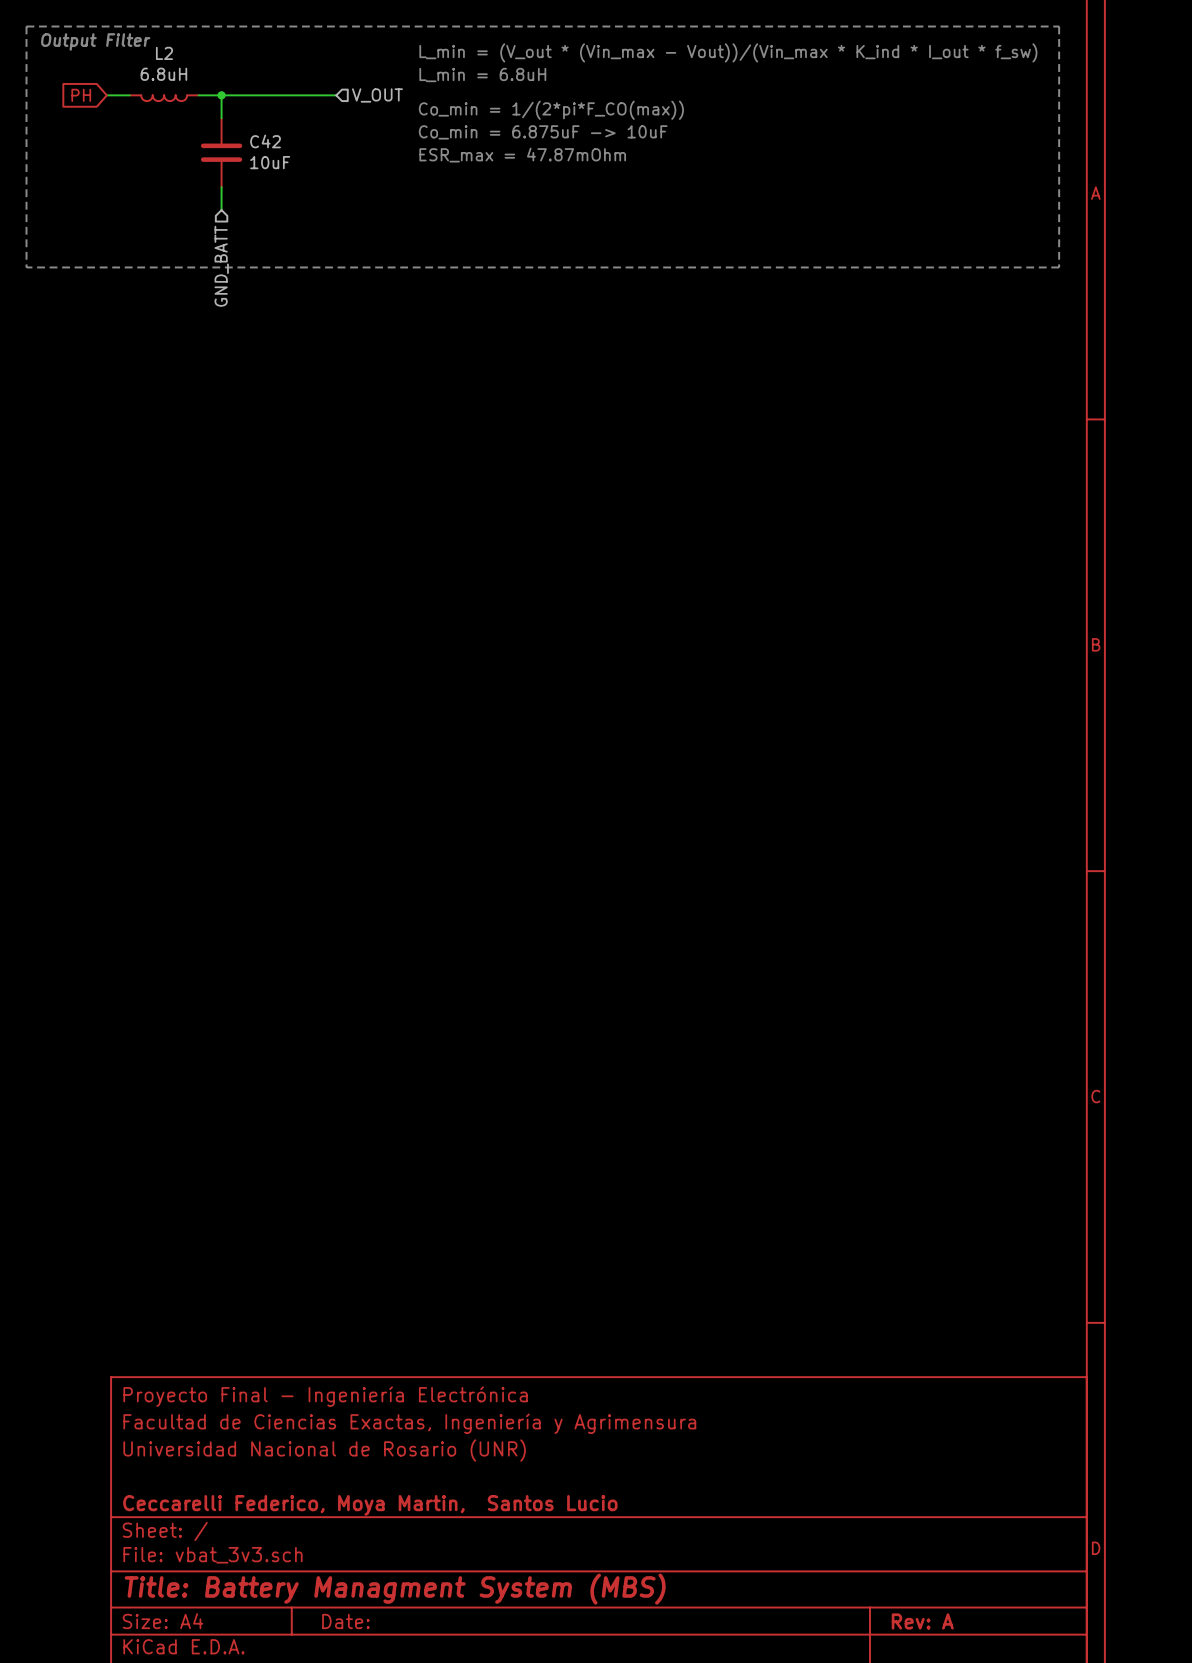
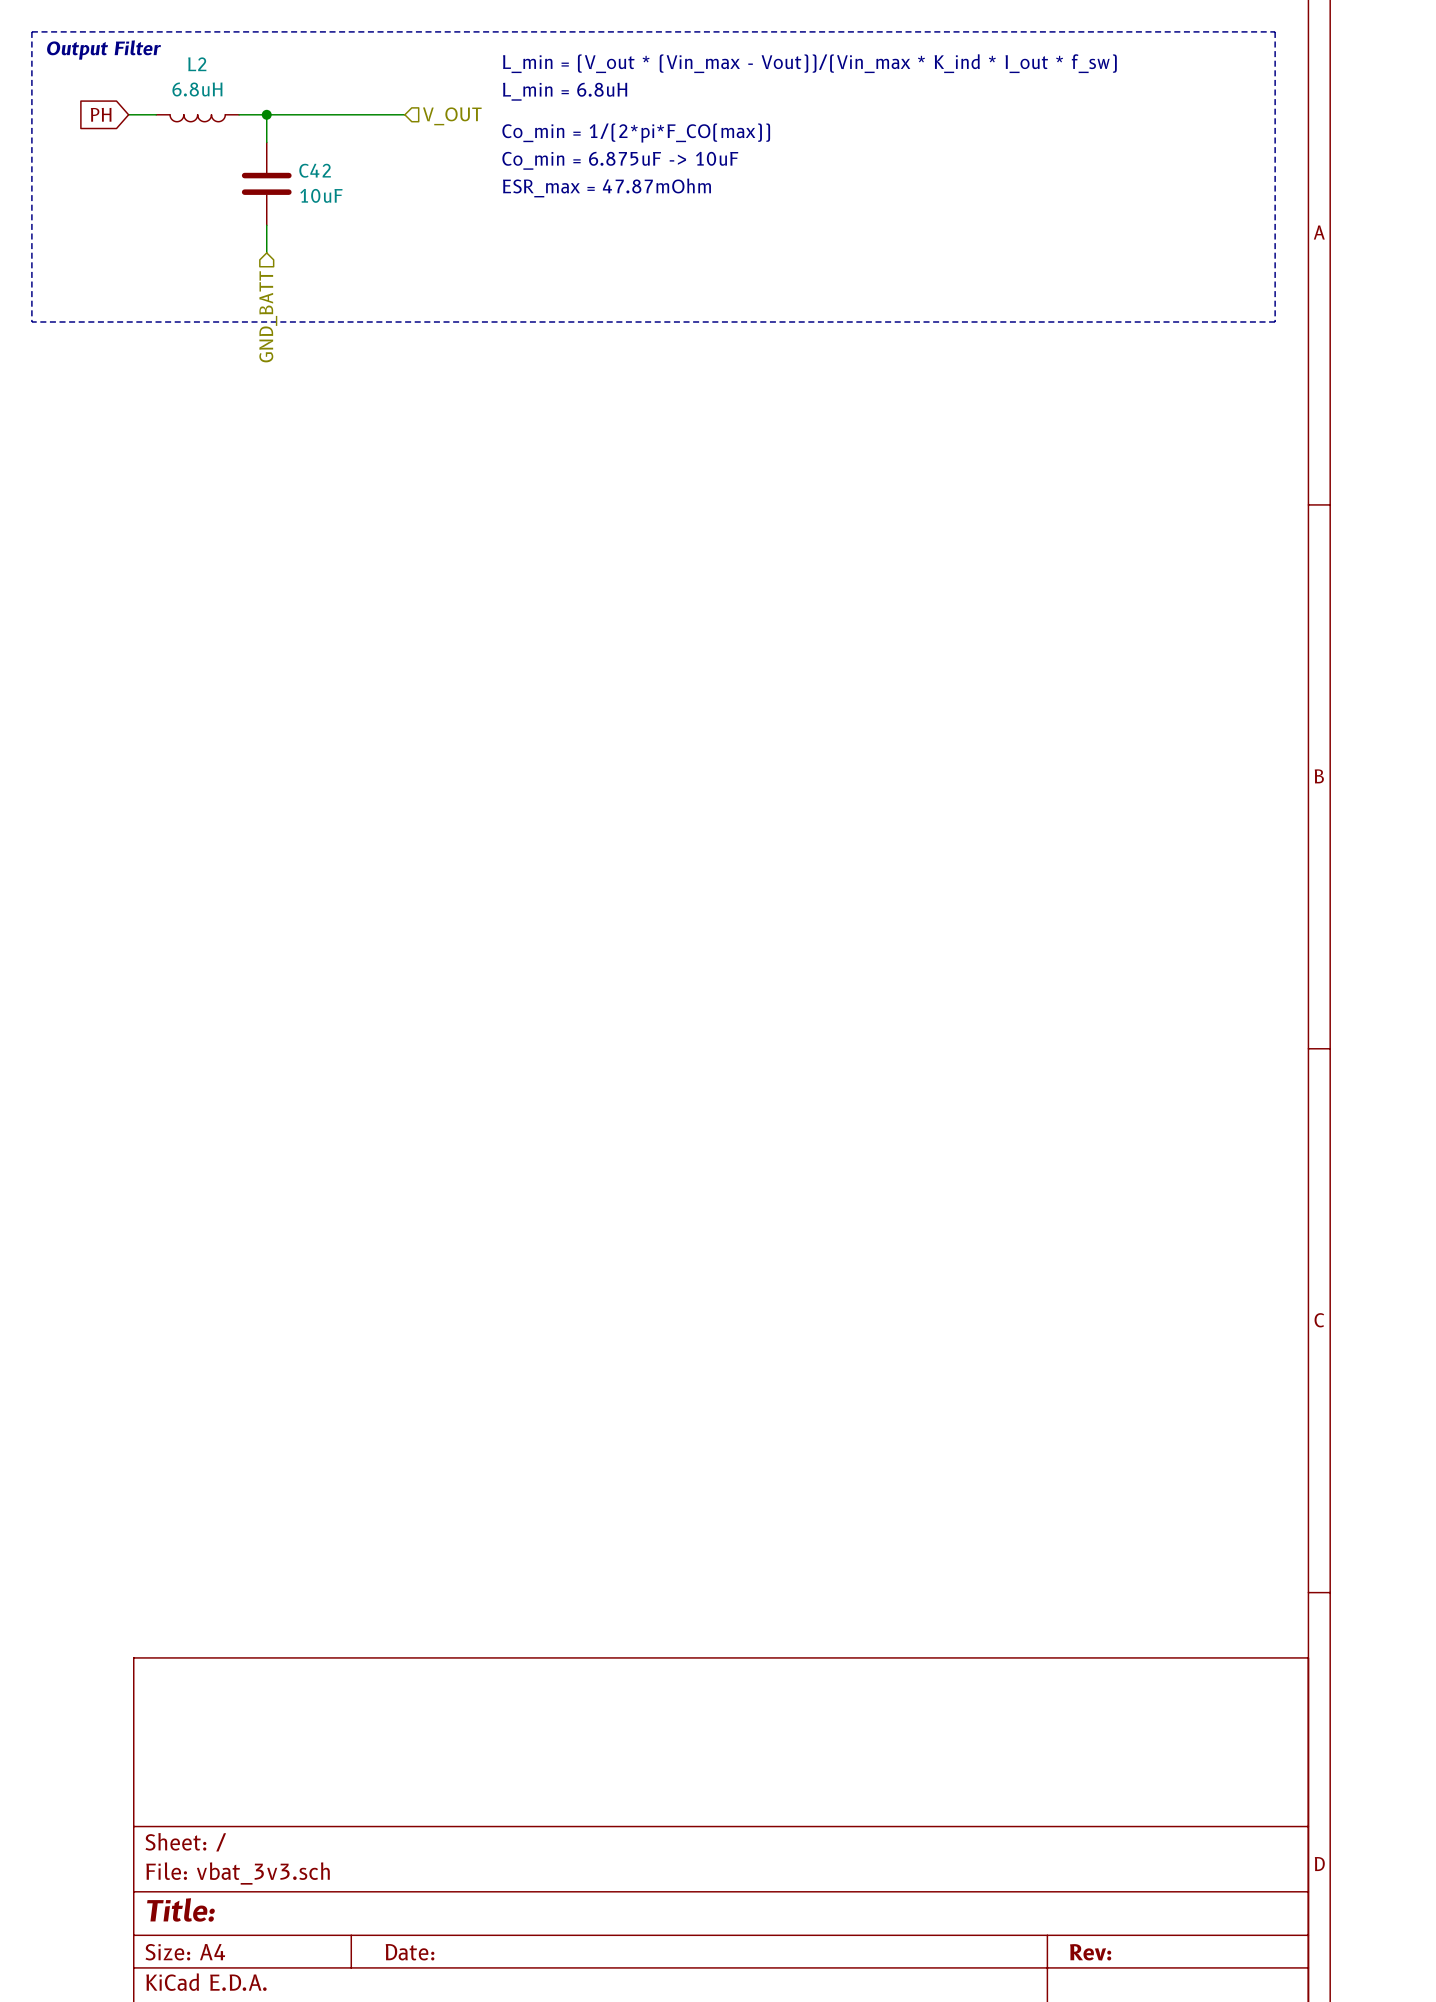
title block: Proyecto Final - Ingeniería Electrónica (325, 1396) -> none
title block: Facultad de Ciencias Exactas, Ingeniería y Agrimensura (409, 1423) -> none
title block: Universidad Nacional de Rosario (UNR) (324, 1450) -> none
title block: Ceccarelli Federico, Moya Martin, Santos Lucio (370, 1505) -> none
title block: Title: Battery Managment System (MBS) (395, 1589) -> Title: (180, 1909)
title block: Rev: A (922, 1621) -> Rev: (1090, 1952)

